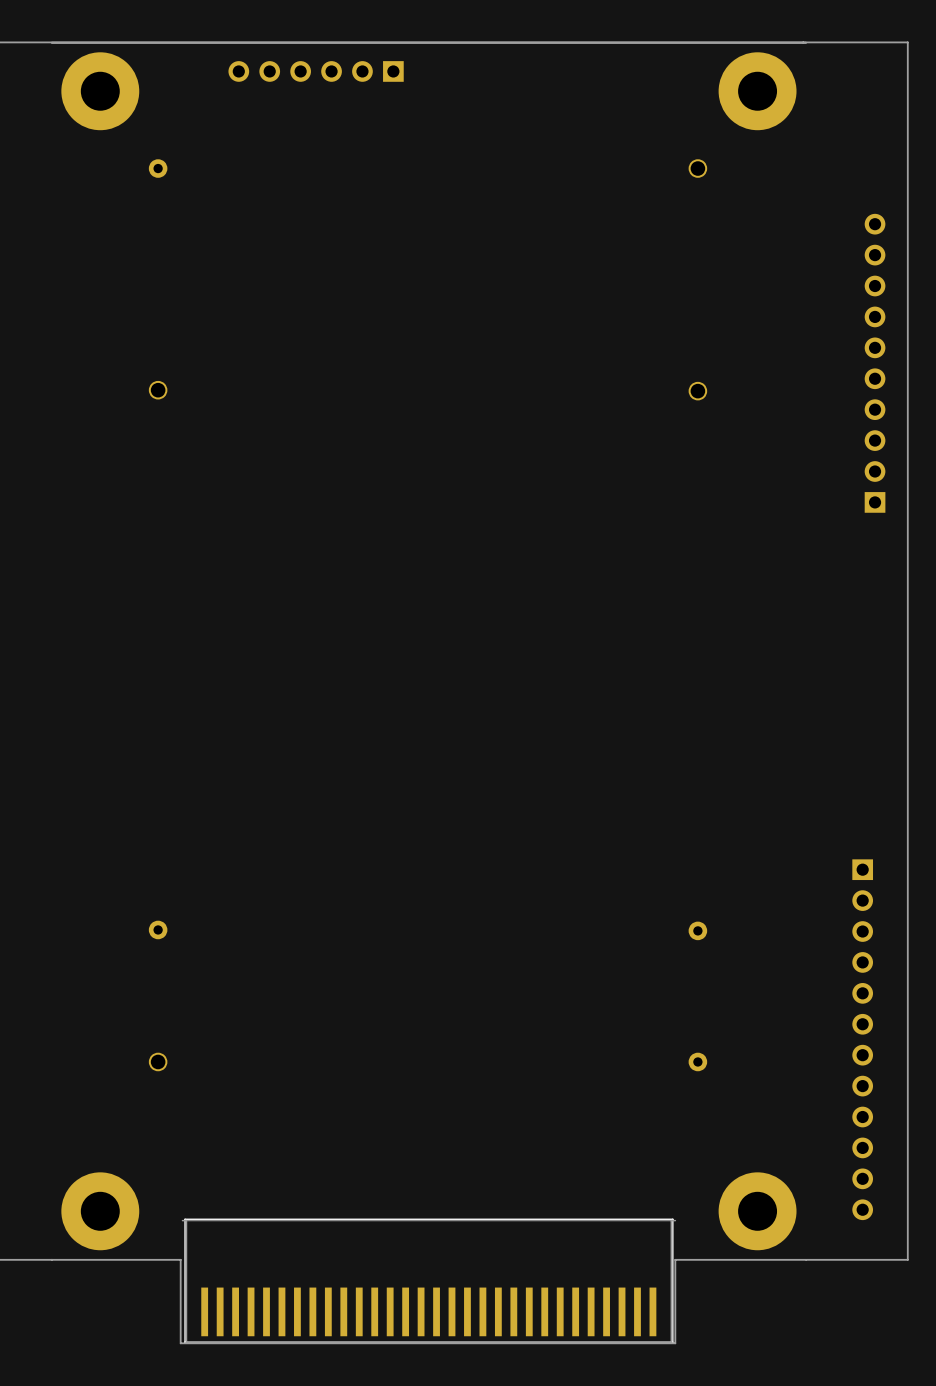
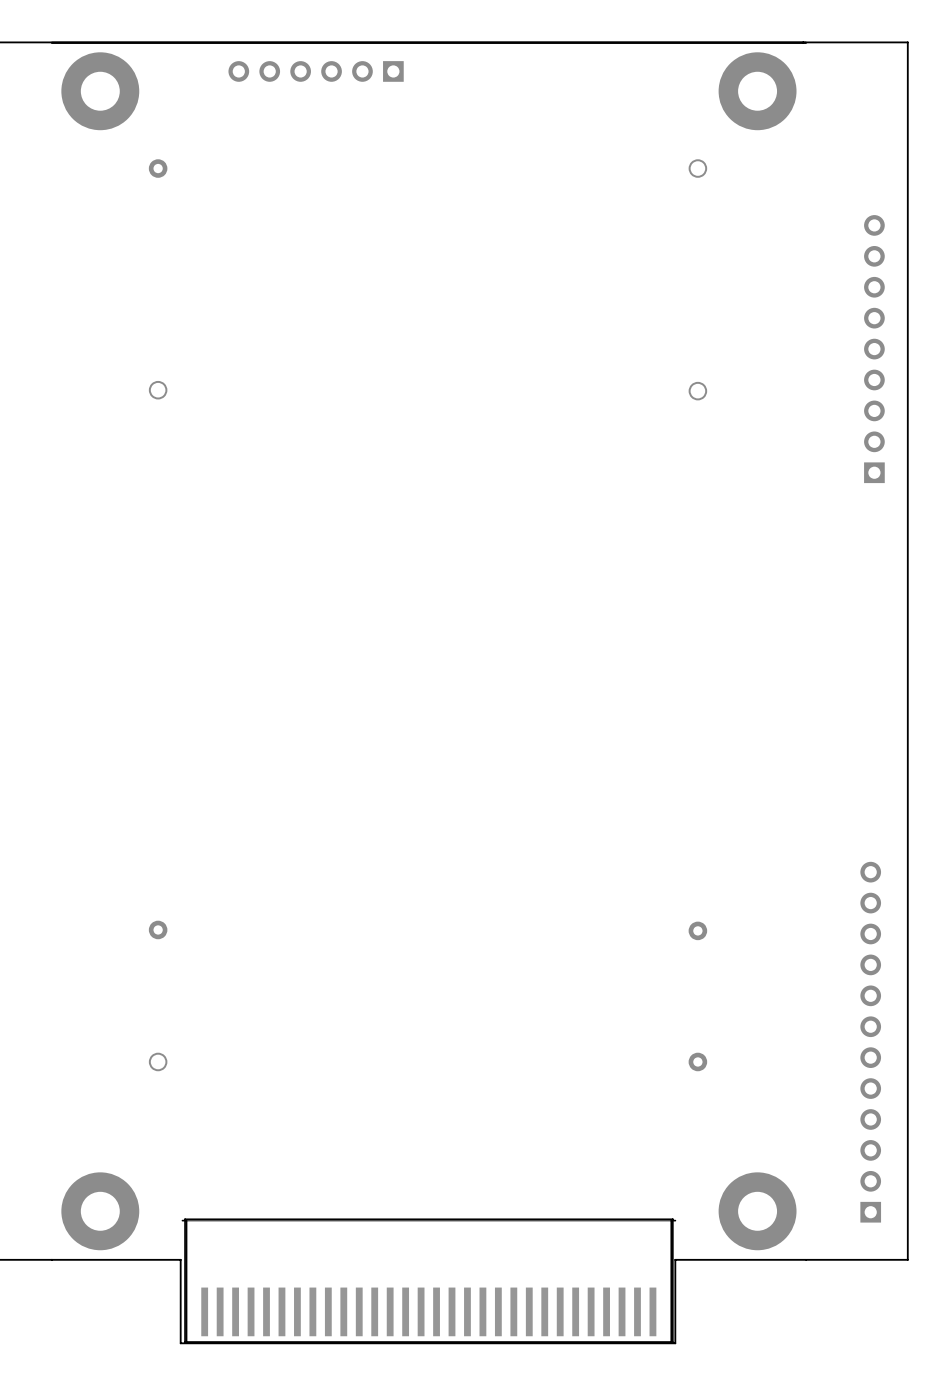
part: none -> (874, 349)
part: (875, 363) -> none
part rotation: 0° (862, 1039) -> 180° (870, 1042)

